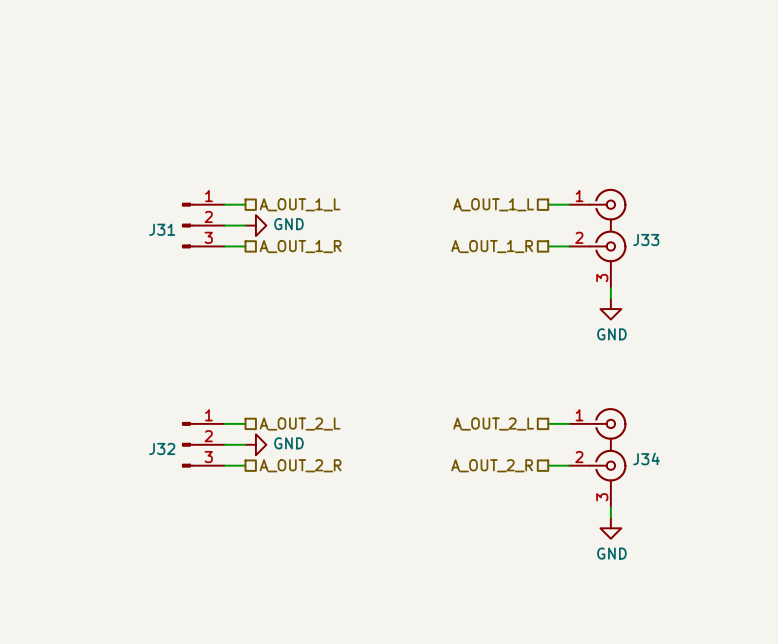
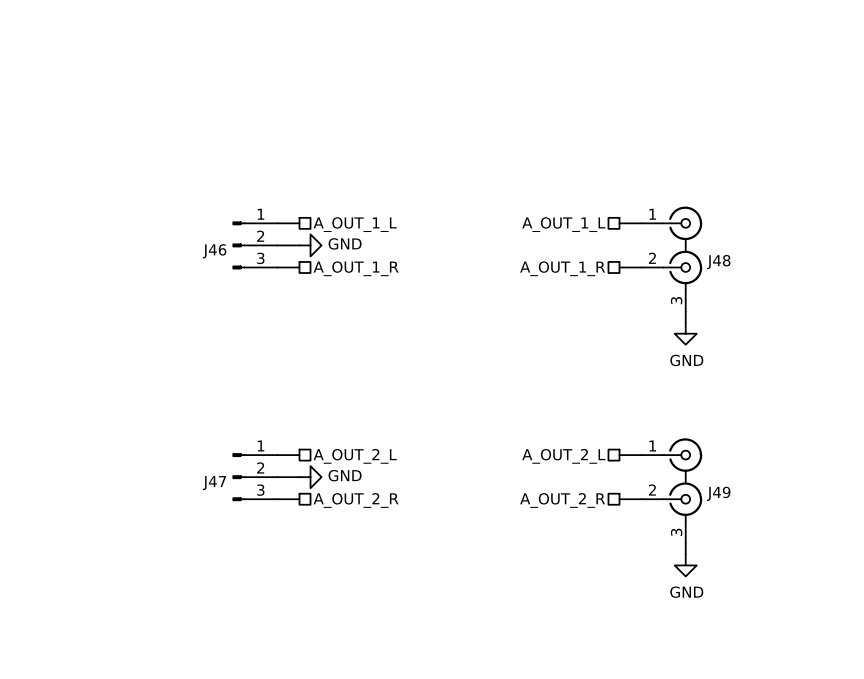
J31 name: J31 (162, 229) -> J46 (214, 251)
J33 name: J33 (646, 240) -> J48 (718, 262)
J32 name: J32 (162, 448) -> J47 (214, 483)
J34 name: J34 (646, 458) -> J49 (718, 493)

